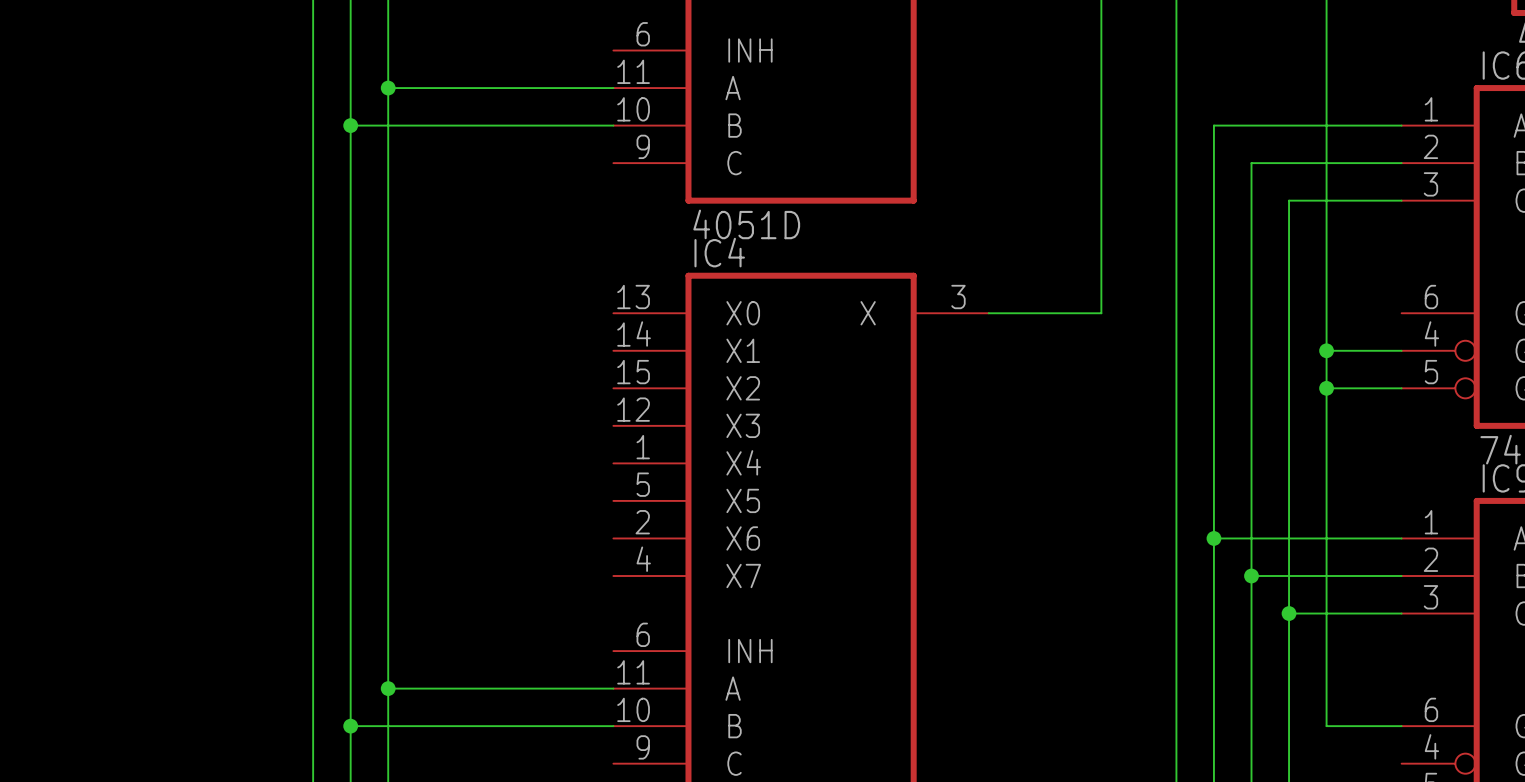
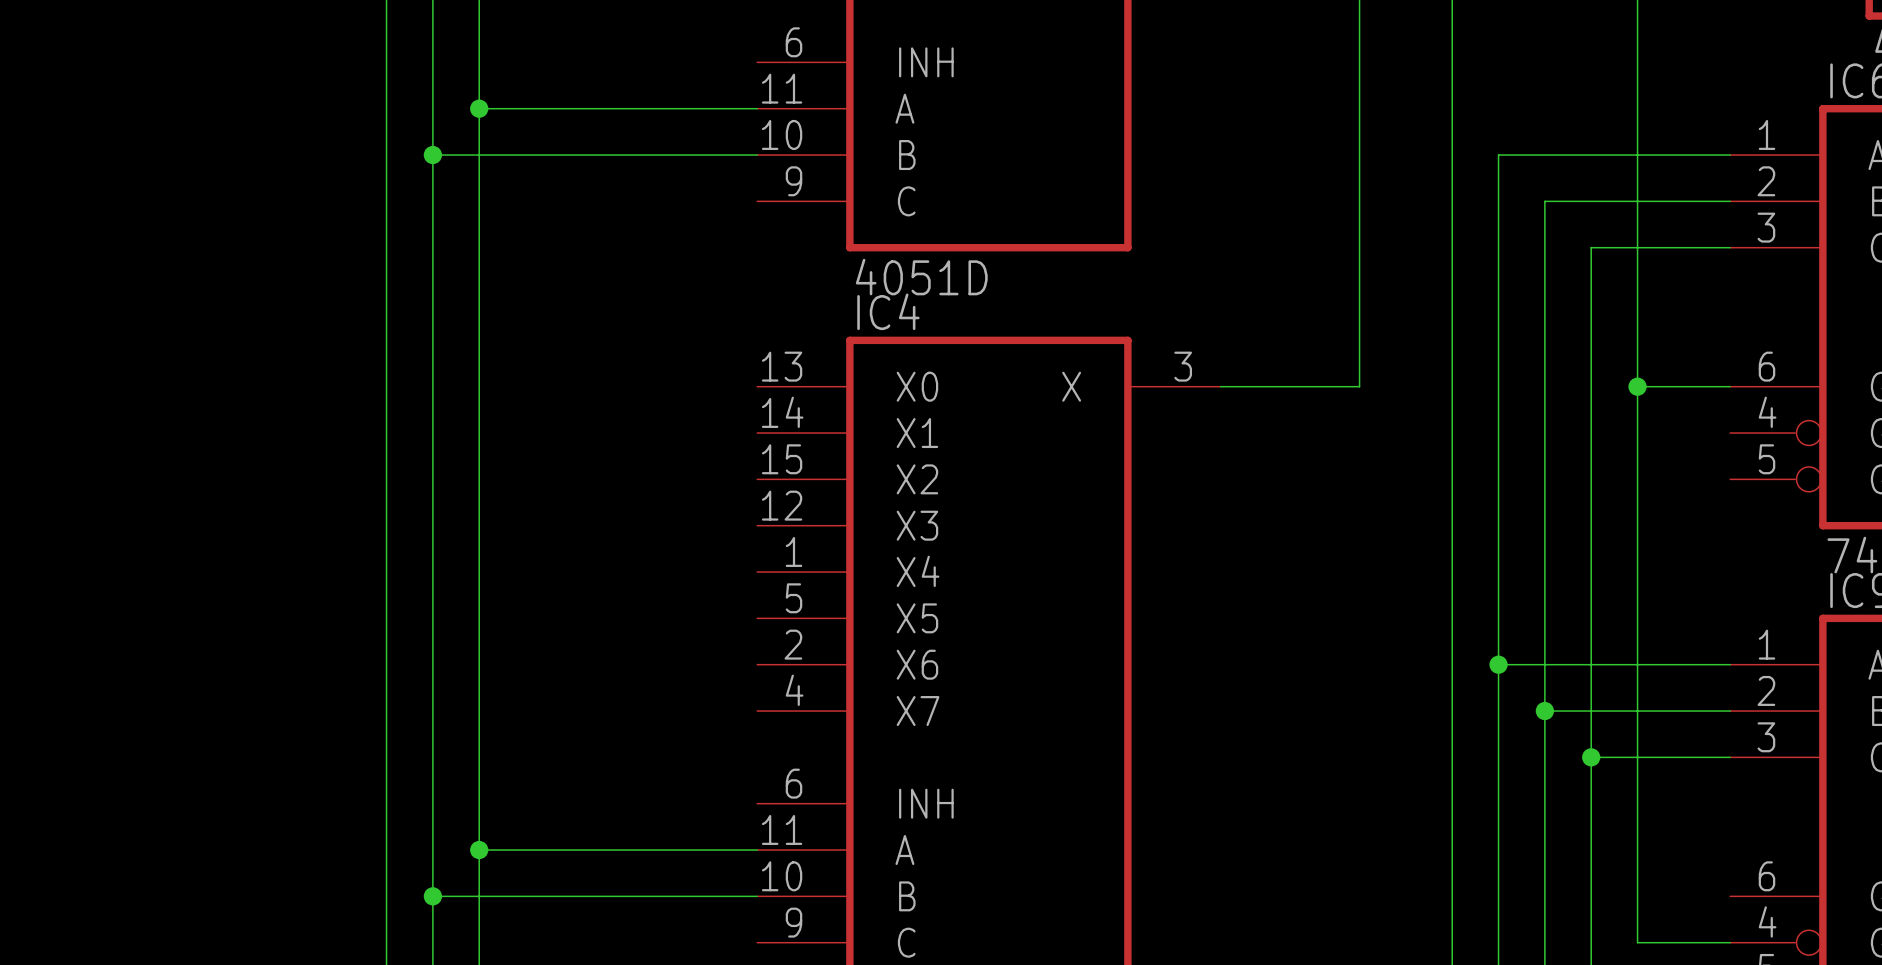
junction: none -> (1637, 386)
wire: (1326, 350) (1401, 350) -> (1637, 386) (1730, 386)
junction: (1326, 350) -> none
wire: (1326, 388) (1401, 388) -> none
junction: (1326, 388) -> none
wire: (1326, 726) (1401, 726) -> (1637, 896) (1637, 942) (1730, 942)

